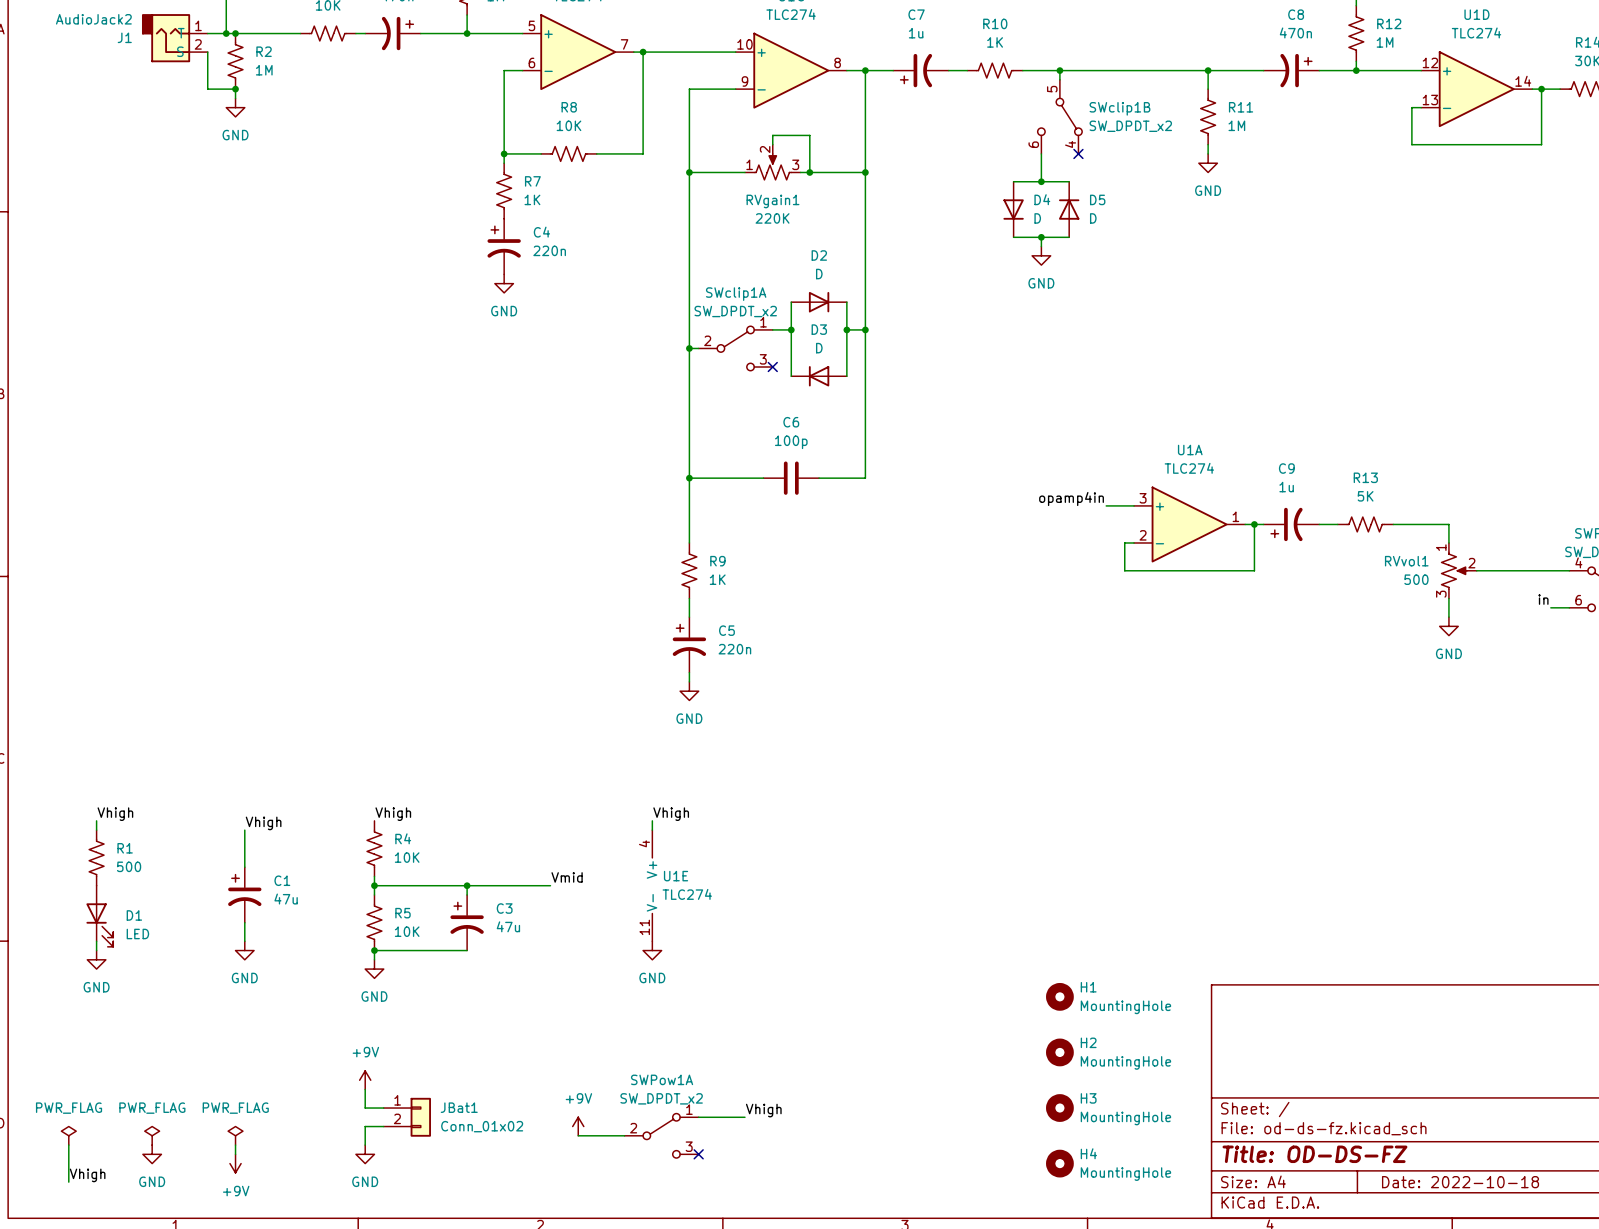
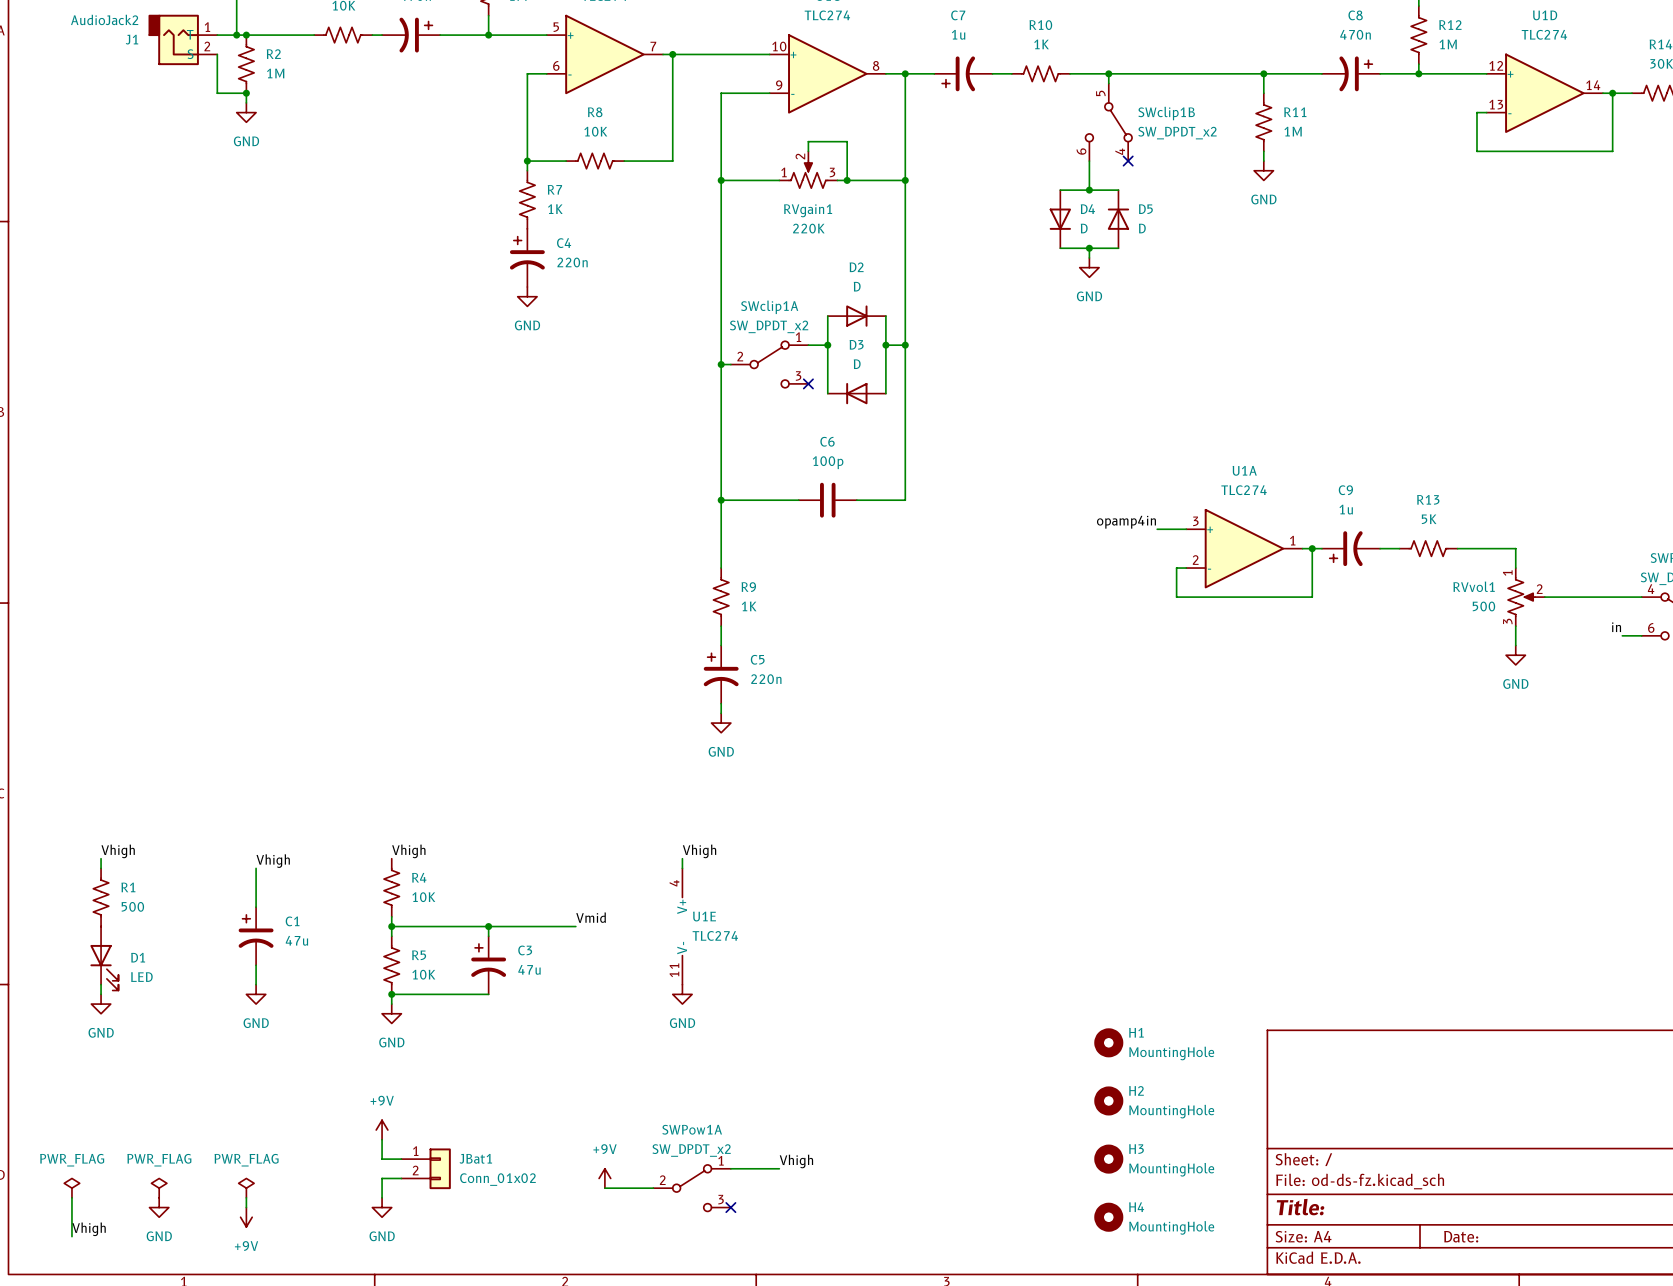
title block: Title: OD-DS-FZ (1314, 1154) -> Title: (1300, 1207)
title block: Date: 2022-10-18 (1460, 1182) -> Date: (1461, 1236)

